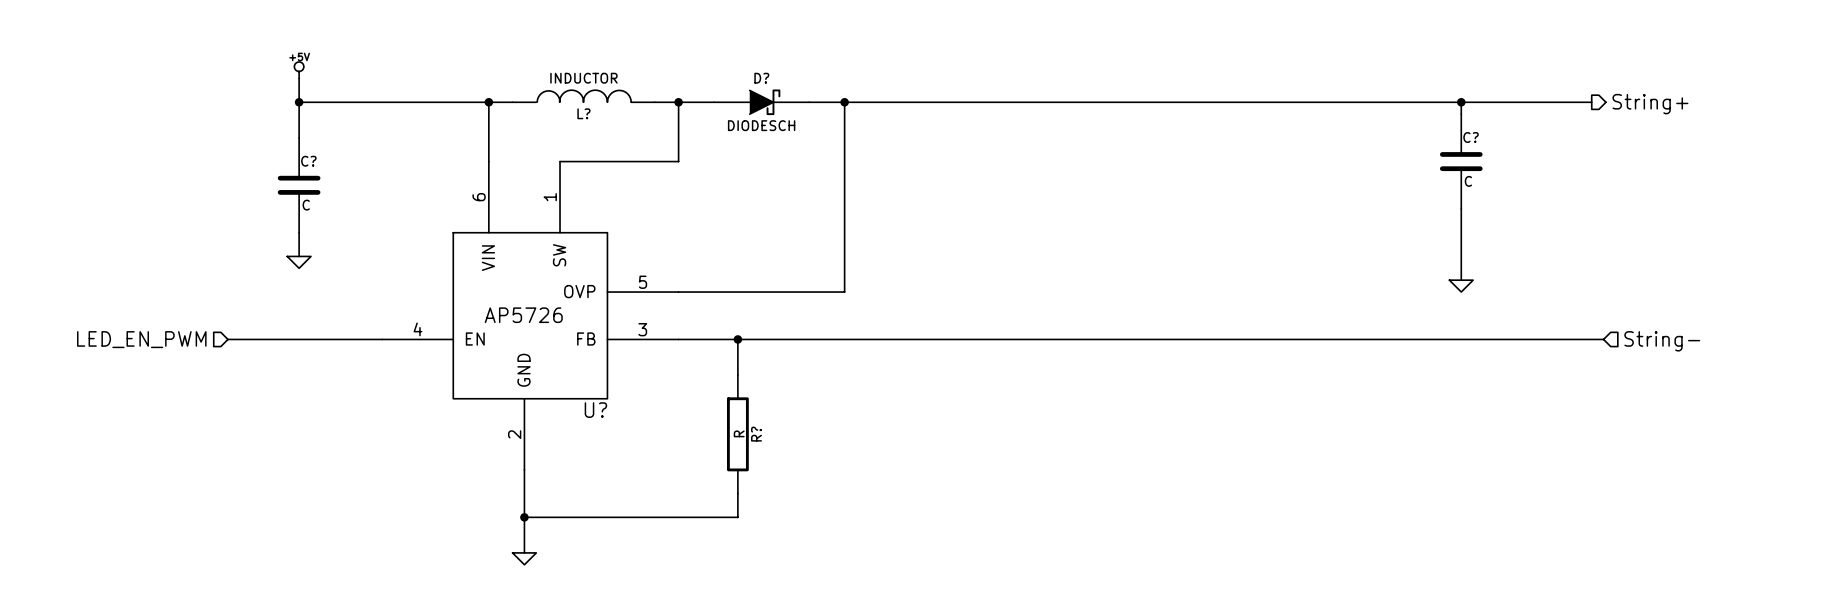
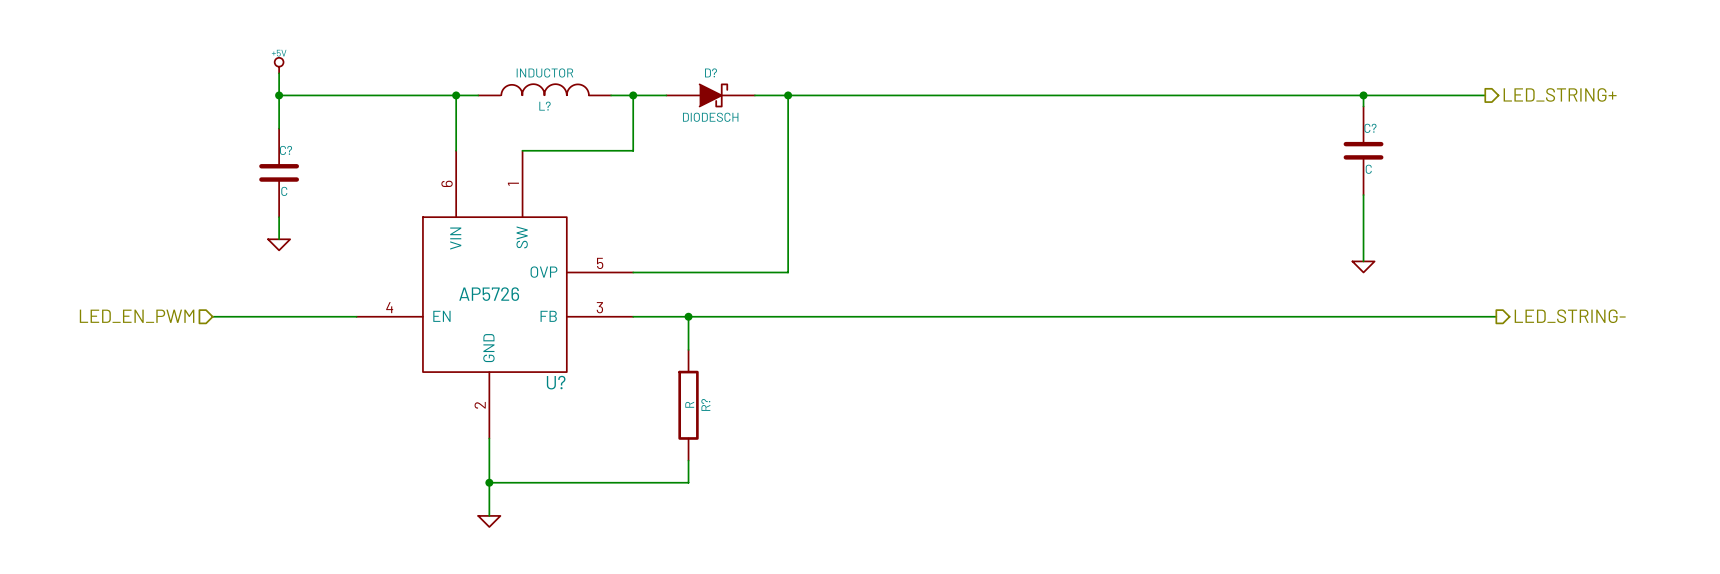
hierarchical label: String+ (1650, 104) -> LED_STRING+ (1560, 94)
hierarchical label shape: input (1662, 341) -> output (1570, 316)
hierarchical label: String- (1662, 341) -> LED_STRING- (1570, 316)

